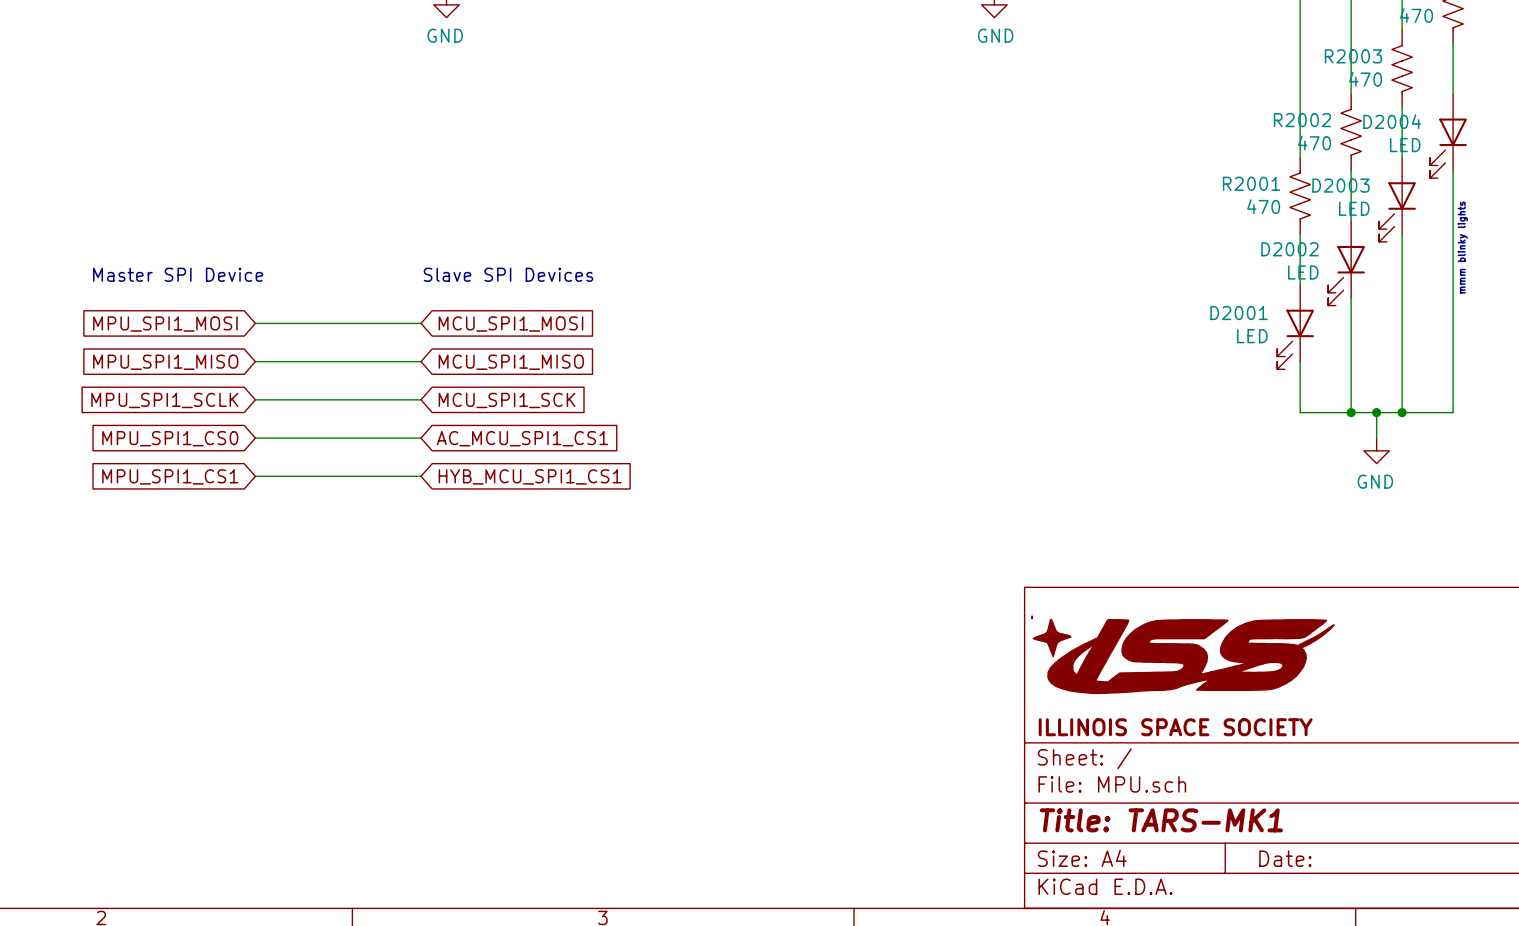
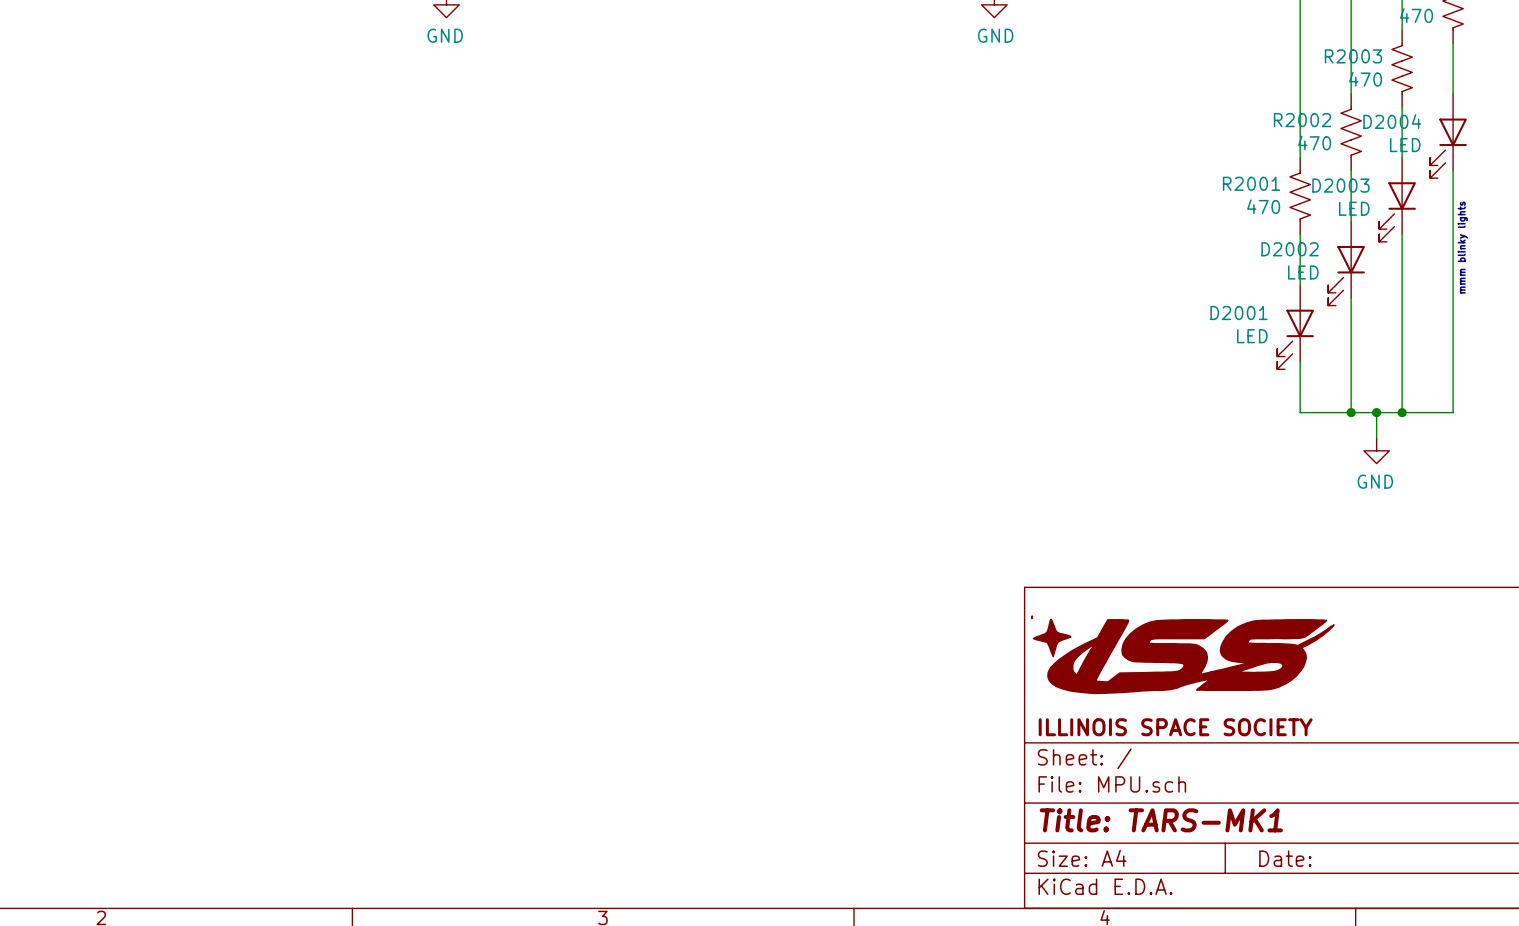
text: Master SPI Device (178, 274) -> none
text: Slave SPI Devices (508, 274) -> none
wire: (255, 323) (421, 323) -> none
global label: MPU_SPI1_MOSI (165, 324) -> none
global label: MCU_SPI1_MOSI (510, 324) -> none
wire: (255, 361) (421, 361) -> none
global label: MPU_SPI1_MISO (165, 362) -> none
global label: MCU_SPI1_MISO (511, 362) -> none
wire: (255, 399) (421, 399) -> none
global label: MPU_SPI1_SCLK (164, 400) -> none
global label: MCU_SPI1_SCK (507, 400) -> none
global label: MPU_SPI1_CS0 (170, 438) -> none
wire: (255, 438) (421, 438) -> none
global label: AC_MCU_SPI1_CS1 (522, 438) -> none
global label: MPU_SPI1_CS1 (170, 476) -> none
wire: (255, 476) (421, 476) -> none
global label: HYB_MCU_SPI1_CS1 (530, 476) -> none

